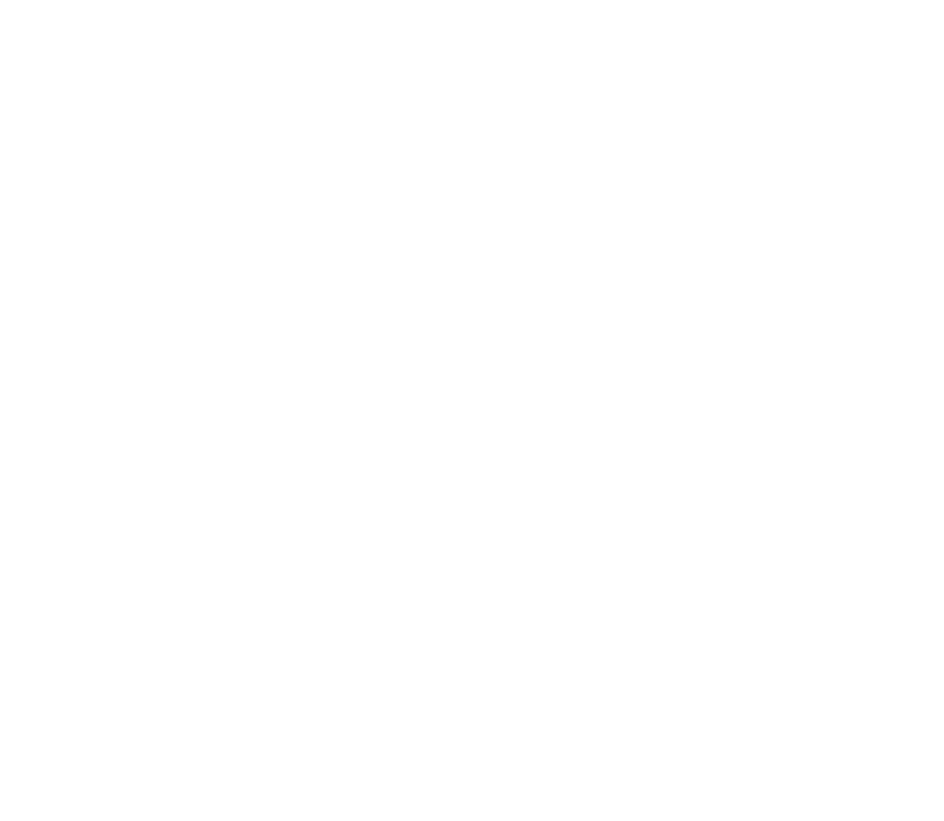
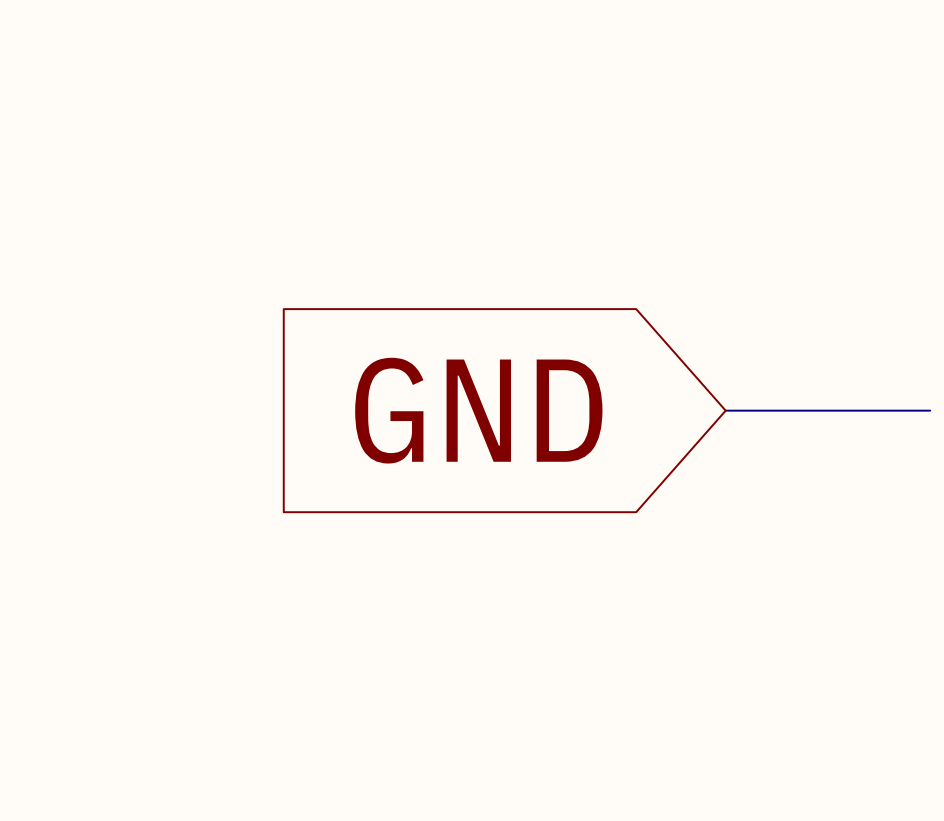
global label: none -> GND (478, 410)
wire: none -> (725, 410) (930, 410)

